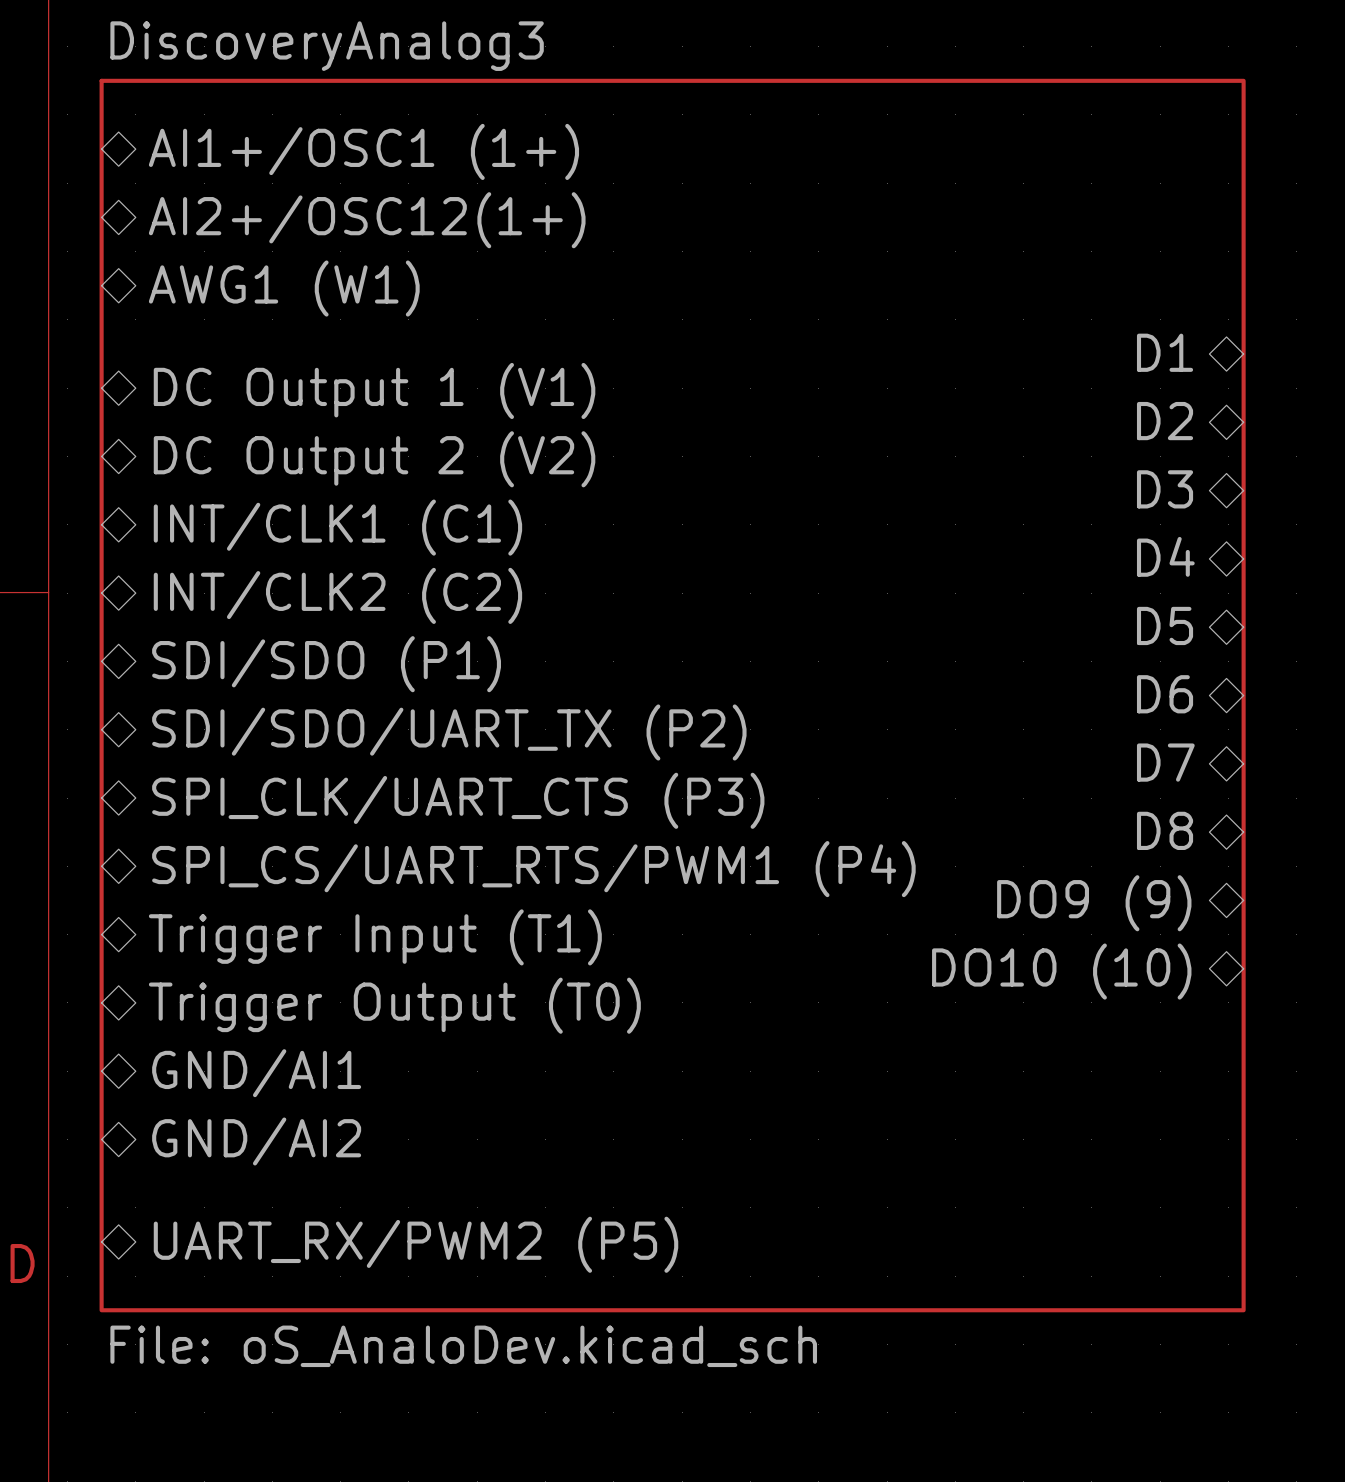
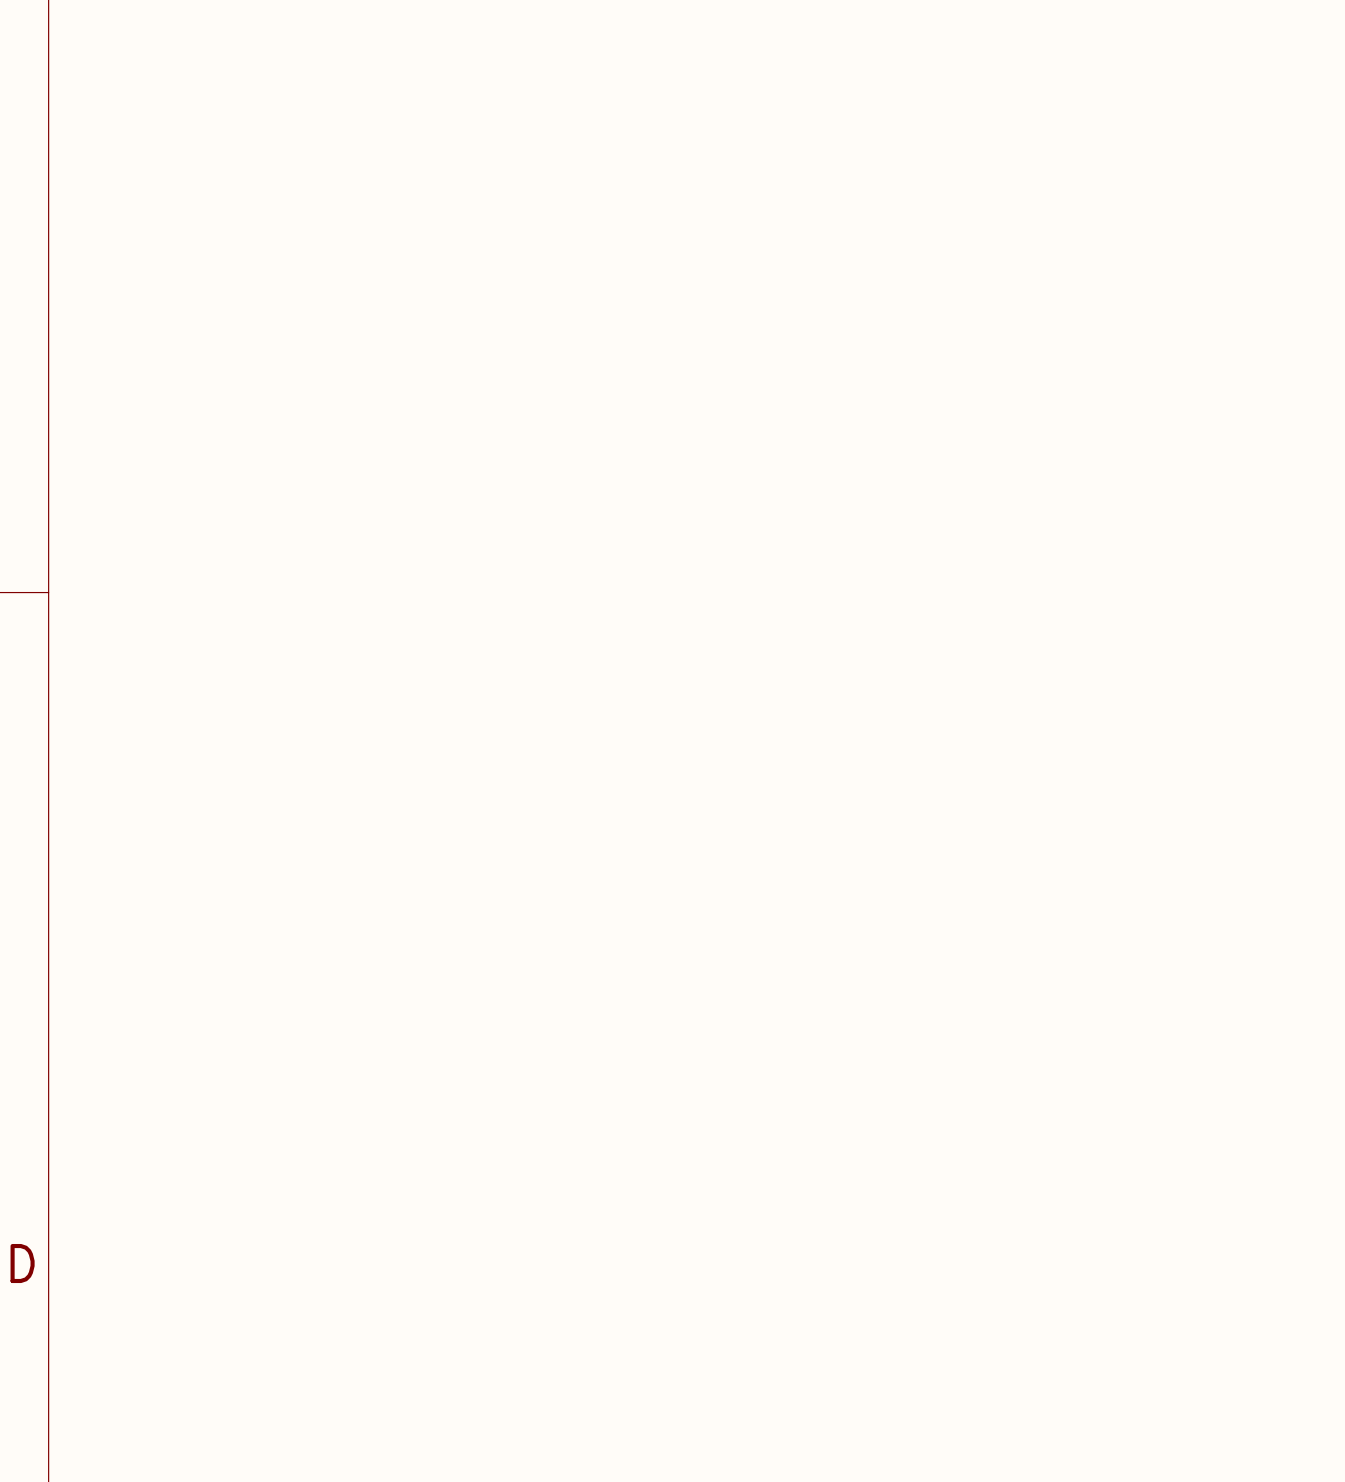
sheet pin: AI1+/OSC1 (1+) (363, 151) -> none
sheet pin: AI2+/OSC12(1+) (367, 220) -> none
sheet pin: AWG1 (W1) (284, 288) -> none
sheet pin: D1 (1165, 352) -> none
sheet pin: DC Output 1 (V1) (374, 390) -> none
sheet pin: D2 (1165, 421) -> none
sheet pin: DC Output 2 (V2) (374, 459) -> none
sheet pin: D3 (1165, 489) -> none
sheet pin: INT/CLK1 (C1) (337, 527) -> none
sheet pin: D4 (1165, 556) -> none
sheet pin: INT/CLK2 (C2) (337, 595) -> none
sheet pin: D5 (1165, 625) -> none
sheet pin: SDI/SDO (P1) (326, 664) -> none
sheet pin: D6 (1165, 694) -> none
sheet DiscoveryAnalog3: File: oS_AnaloDev.kicad_sch (672, 695) -> none
sheet pin: SDI/SDO/UART_TX (P2) (449, 732) -> none
sheet pin: D7 (1165, 762) -> none
sheet pin: SPI_CLK/UART_CTS (P3) (458, 800) -> none
sheet pin: D8 (1165, 830) -> none
sheet pin: SPI_CS/UART_RTS/PWM1 (P4) (533, 869) -> none
sheet pin: DO9 (9) (1094, 903) -> none
sheet pin: Trigger Input (T1) (375, 937) -> none
sheet pin: DO10 (10) (1061, 971) -> none
sheet pin: Trigger Output (T0) (394, 1005) -> none
sheet pin: GND/AI1 (256, 1073) -> none
sheet pin: GND/AI2 (256, 1141) -> none
sheet pin: UART_RX/PWM2 (P5) (416, 1244) -> none

